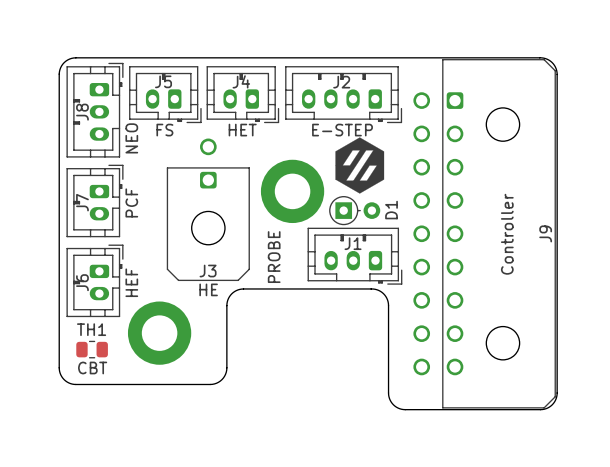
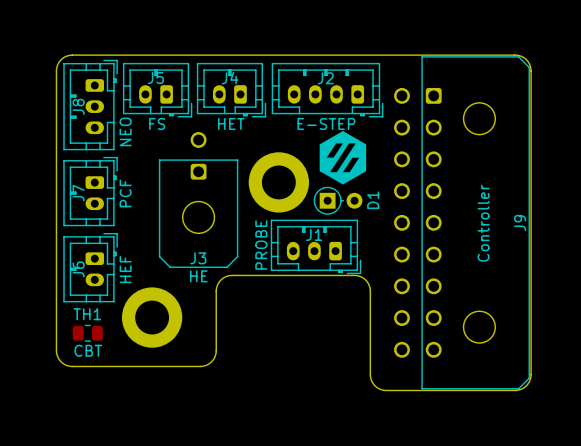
J1 footprint: [307, 227, 403, 285] -> [270, 219, 362, 275]

